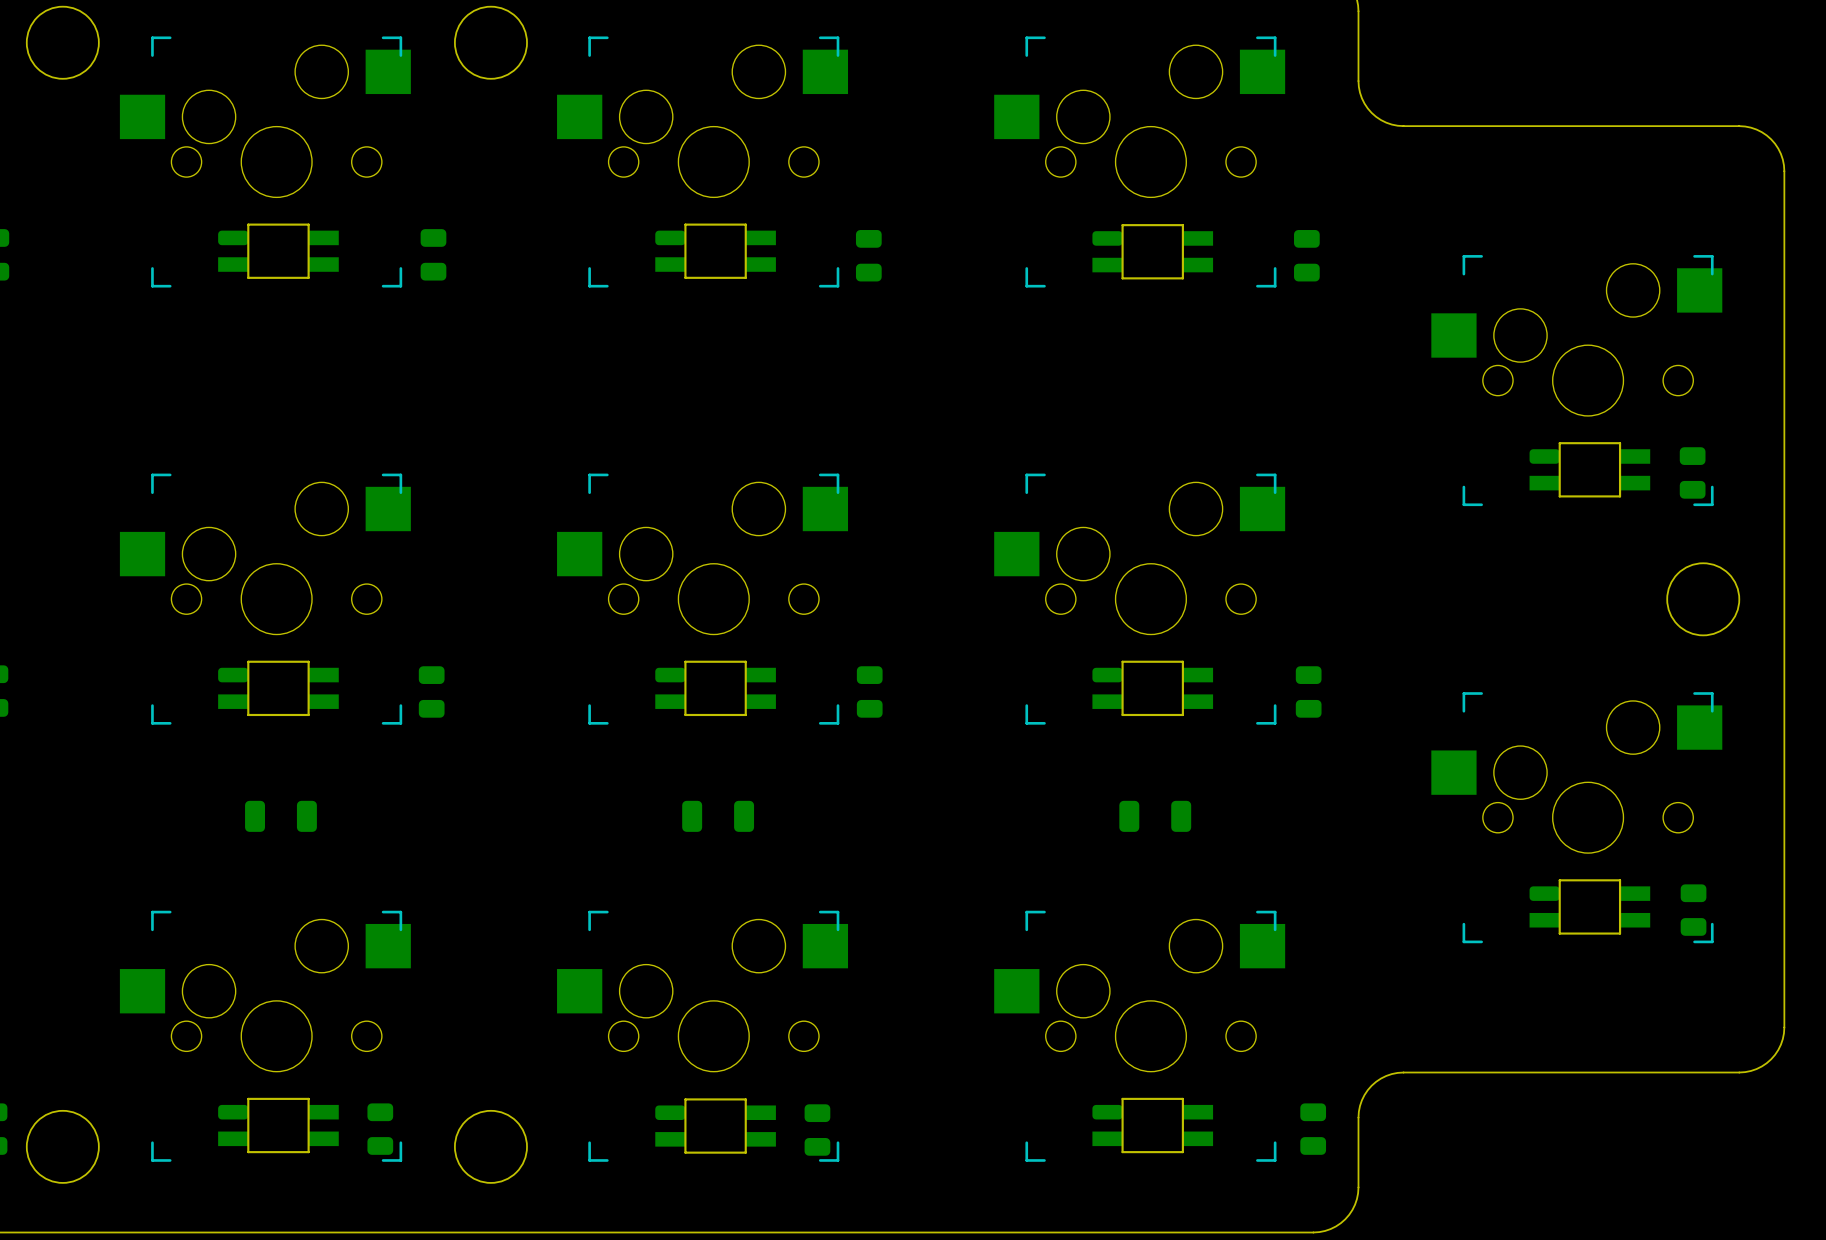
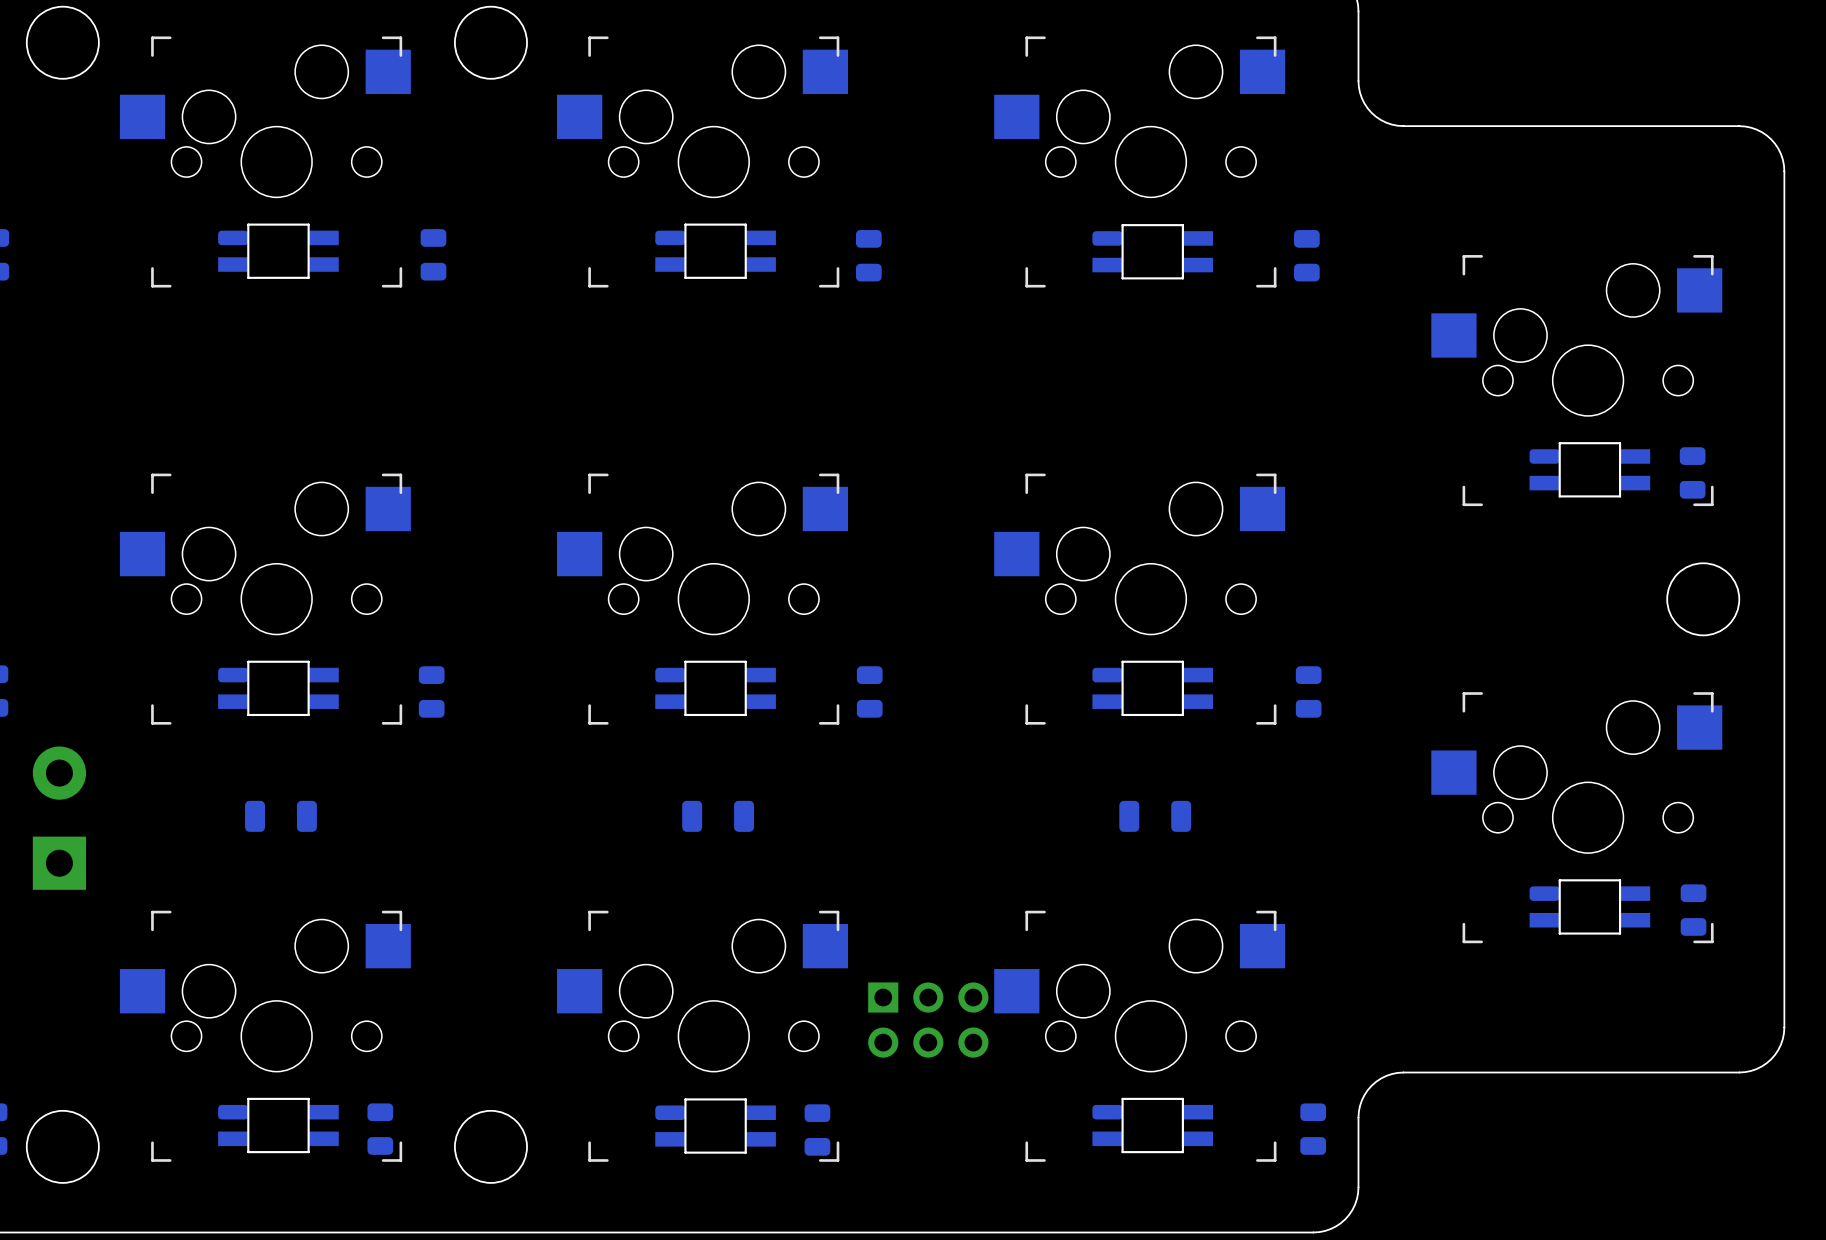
part: none -> (59, 818)
part: none -> (928, 1020)

